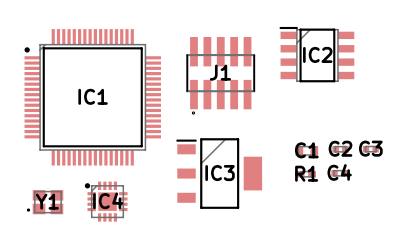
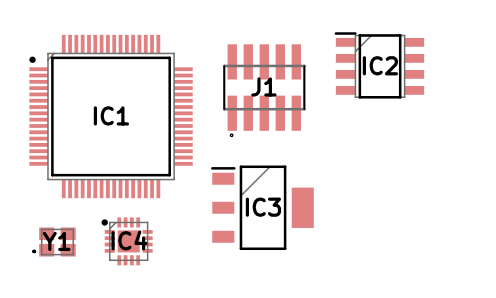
C2: (340, 149) -> none
C3: (370, 149) -> none
C1: (306, 150) -> none
C4: (339, 173) -> none
R1: (306, 174) -> none

